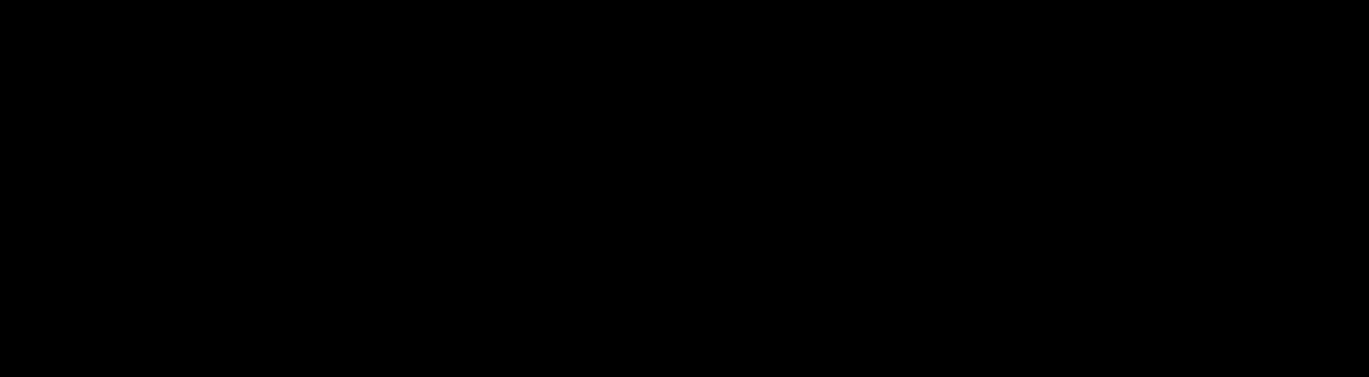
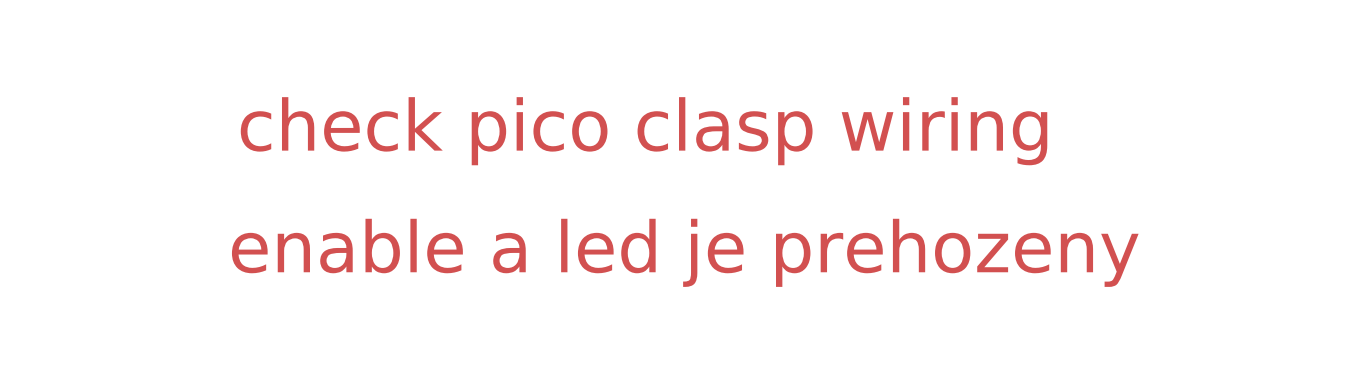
text: none -> check pico clasp wiring (644, 131)
text: none -> enable a led je prehozeny (685, 252)

